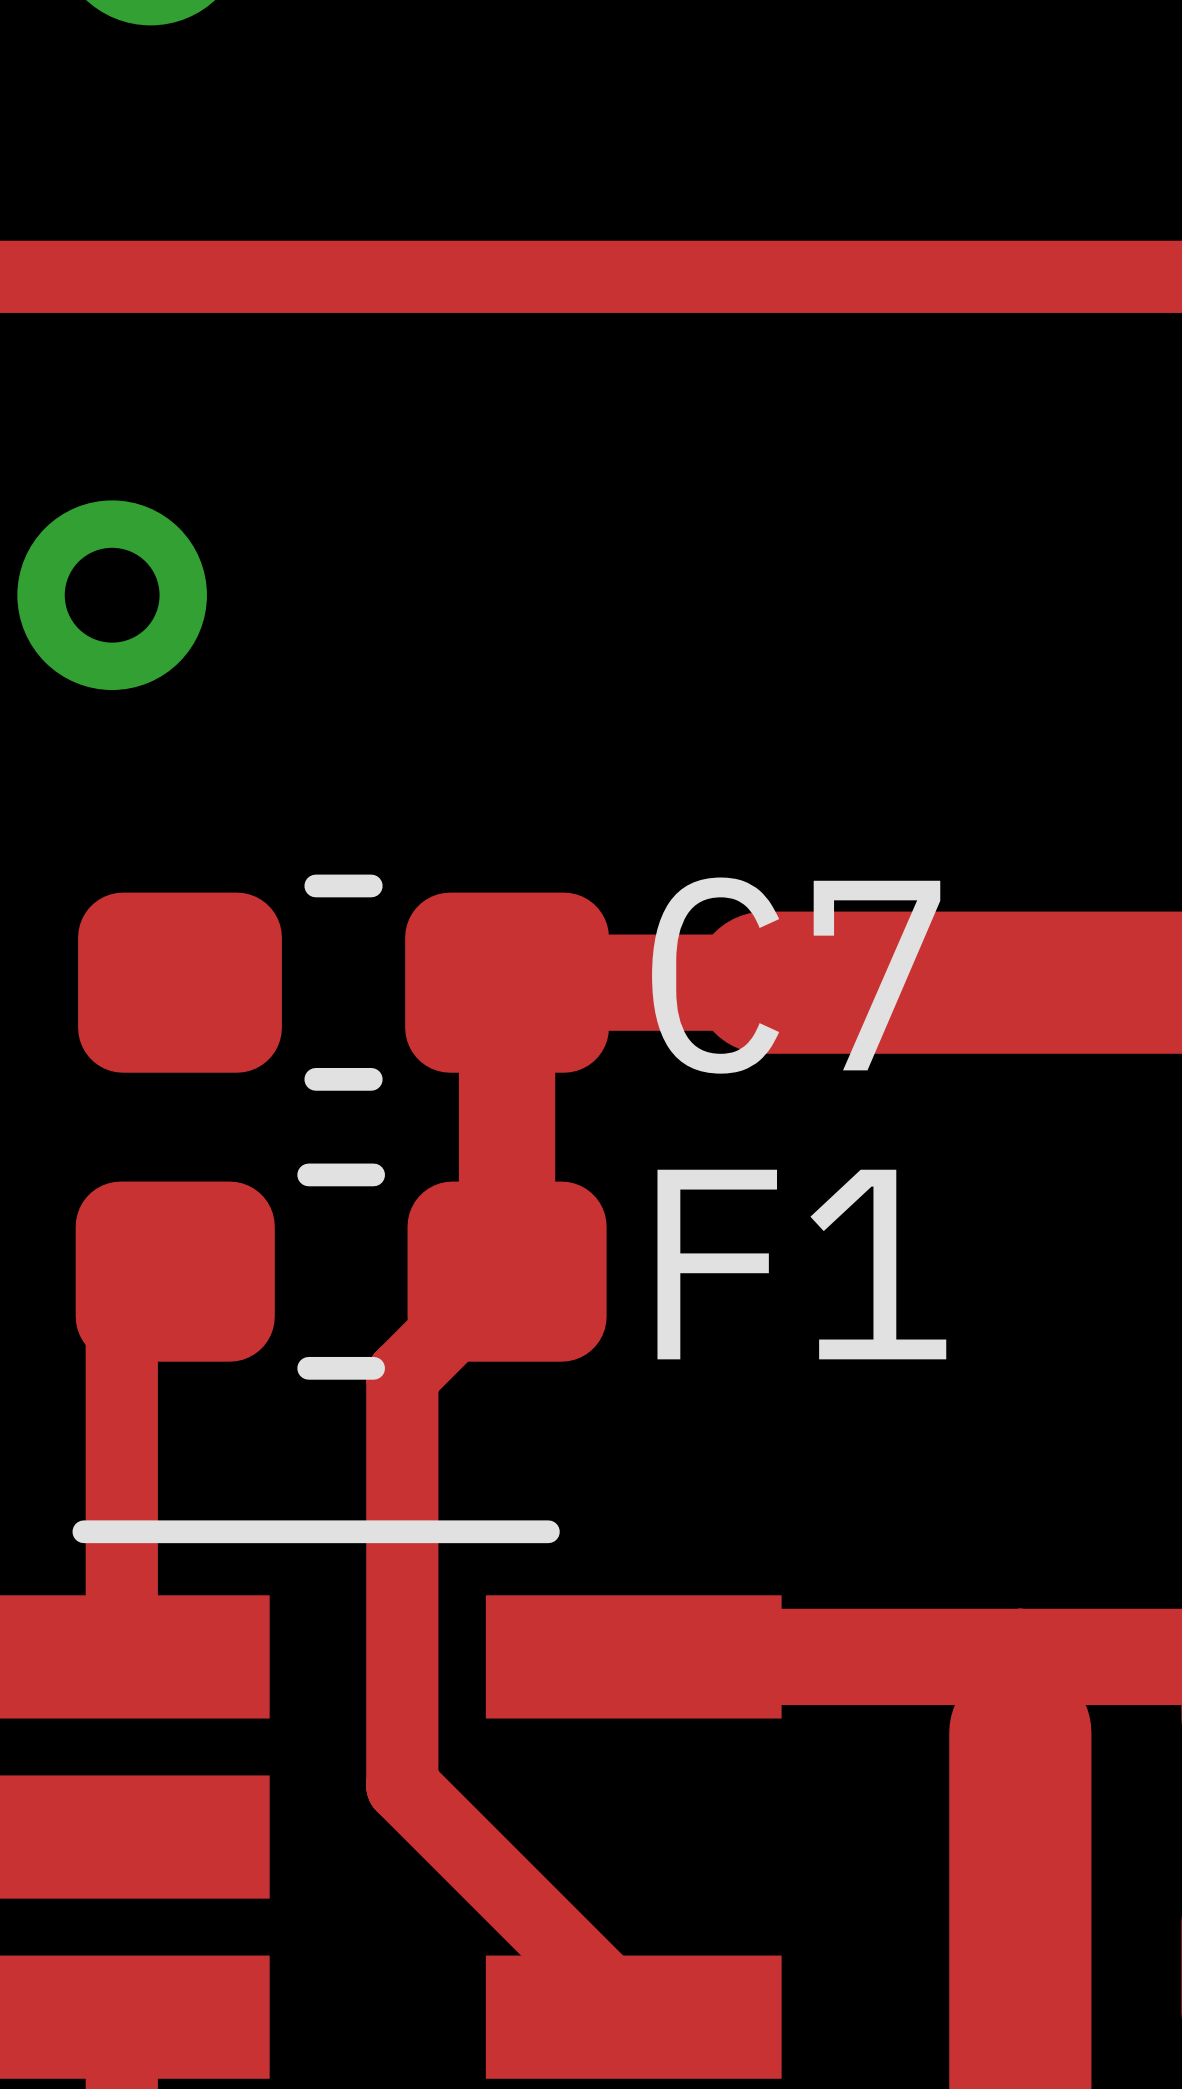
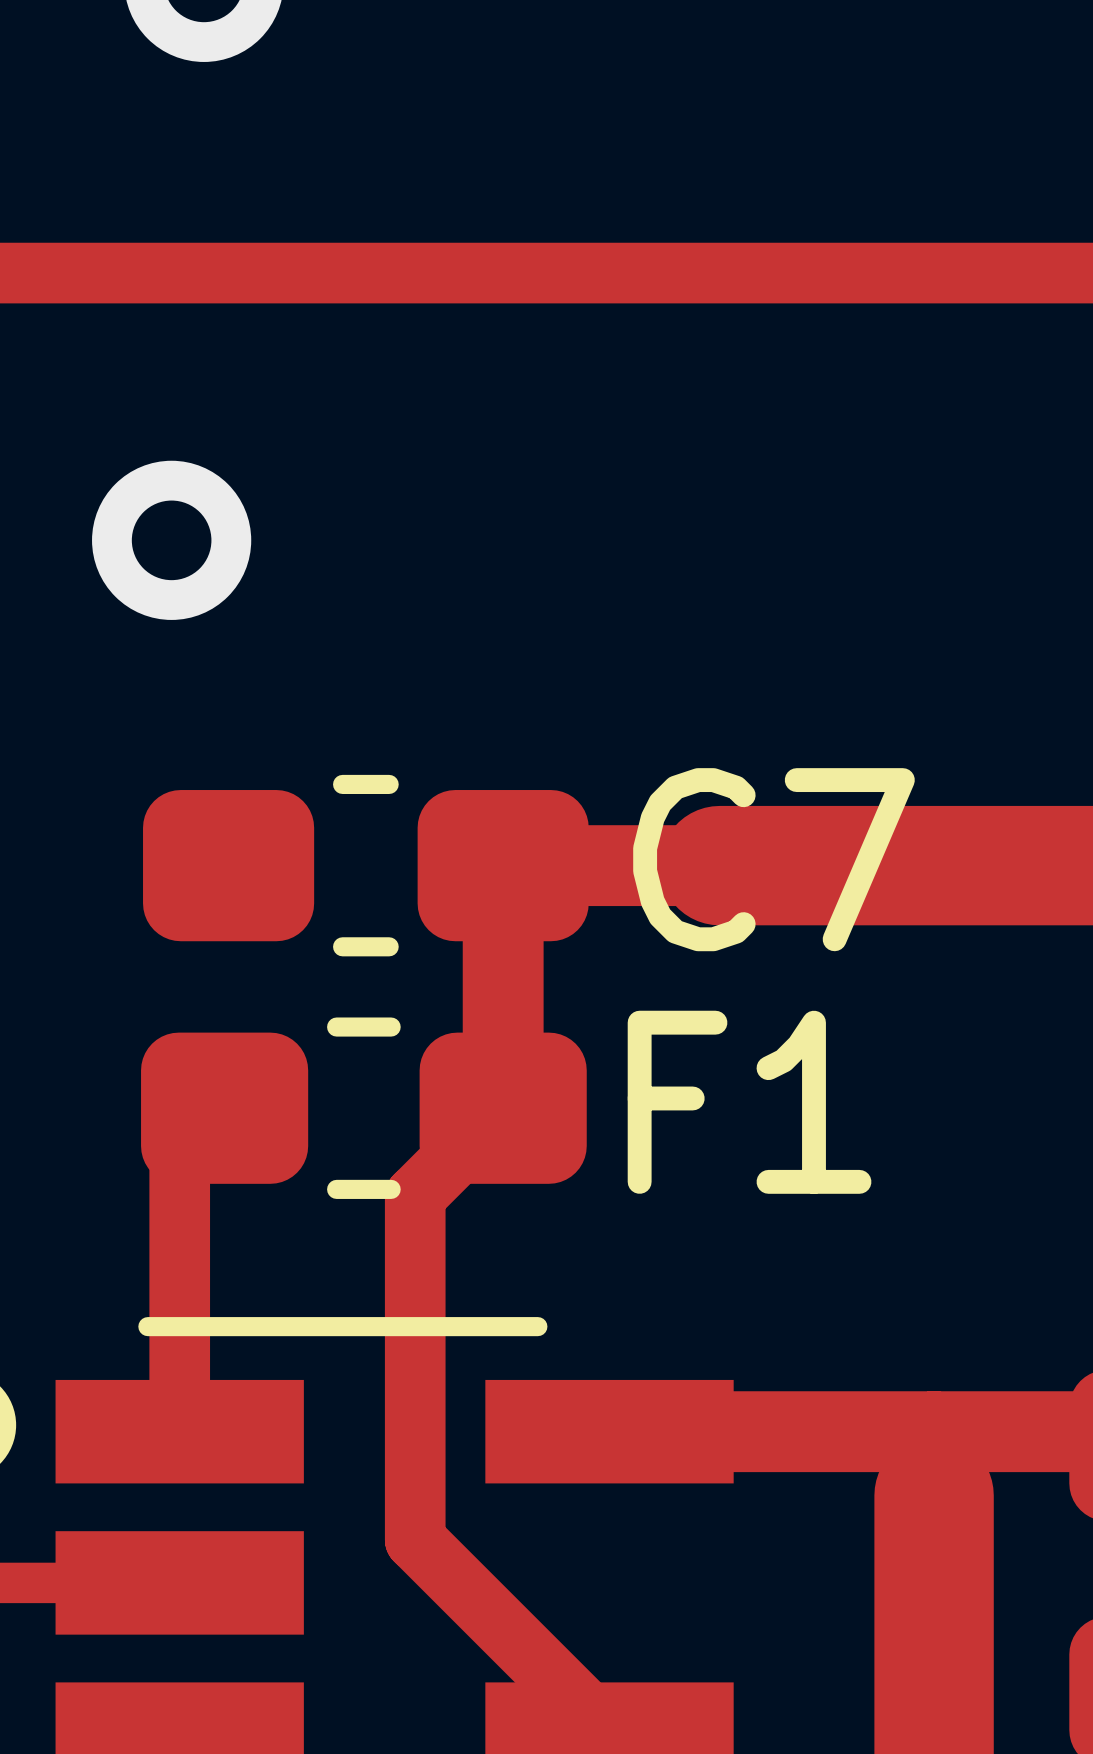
C7 name position: C7 (796, 975) -> C7 (773, 859)

